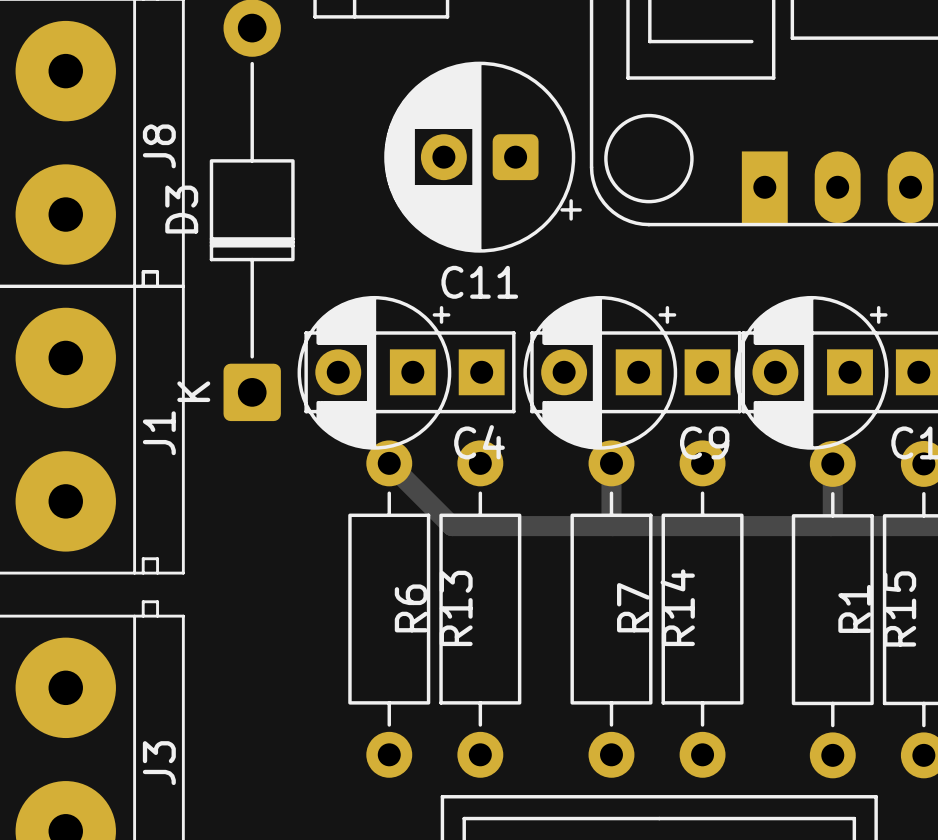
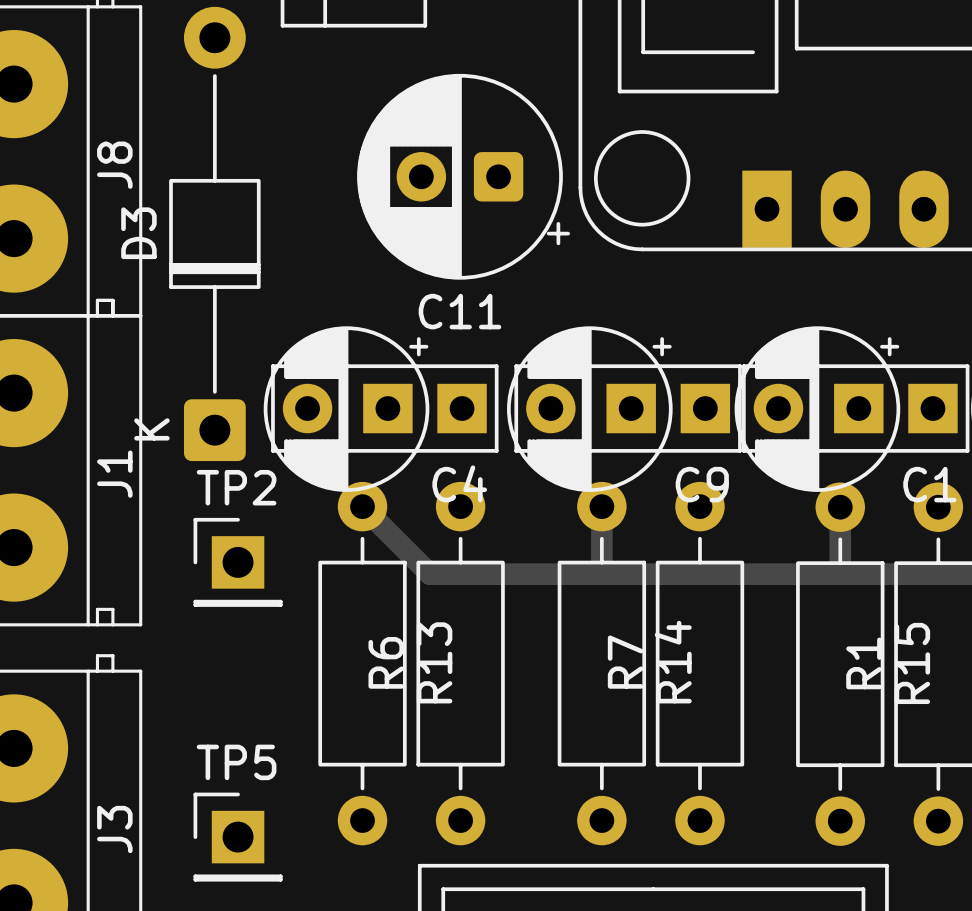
TP2: none -> (238, 562)
TP5: none -> (238, 837)

